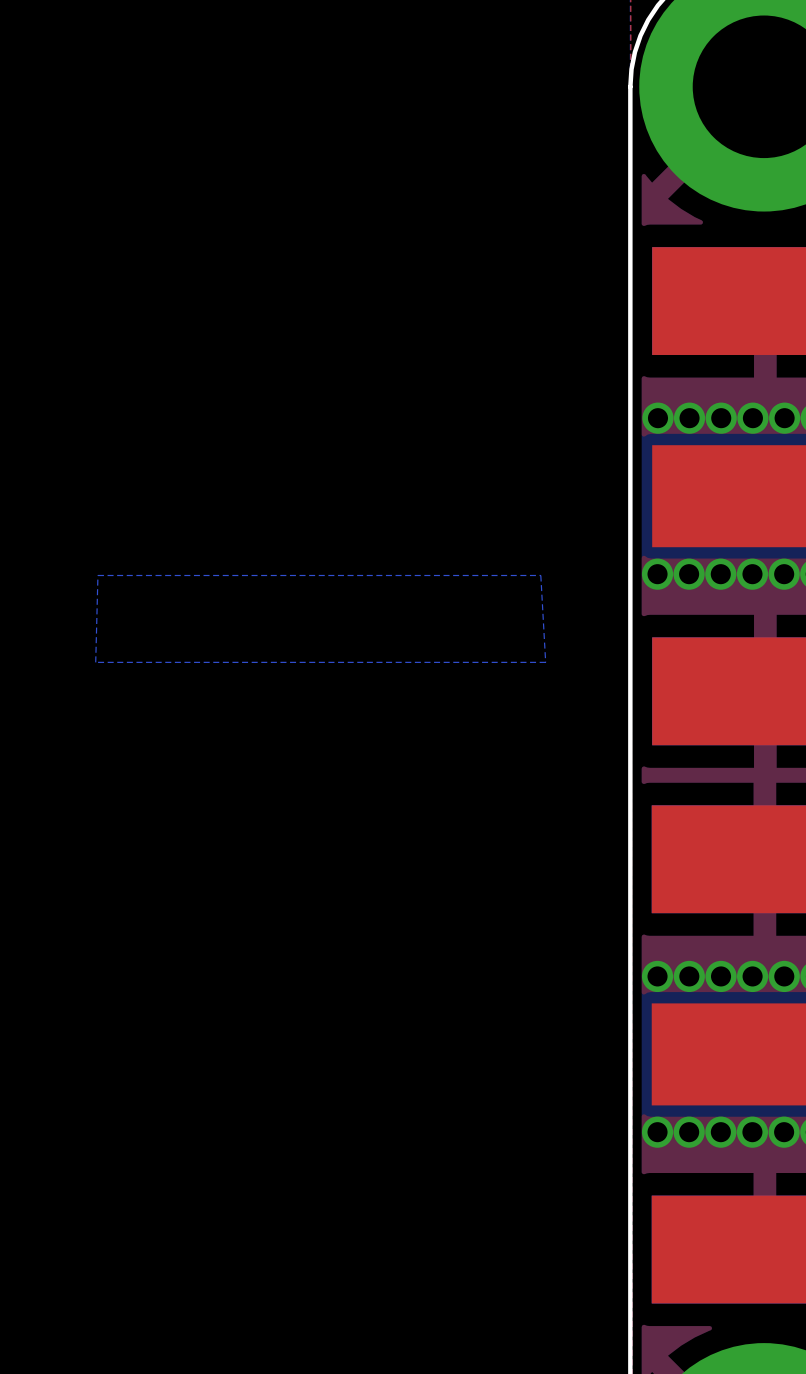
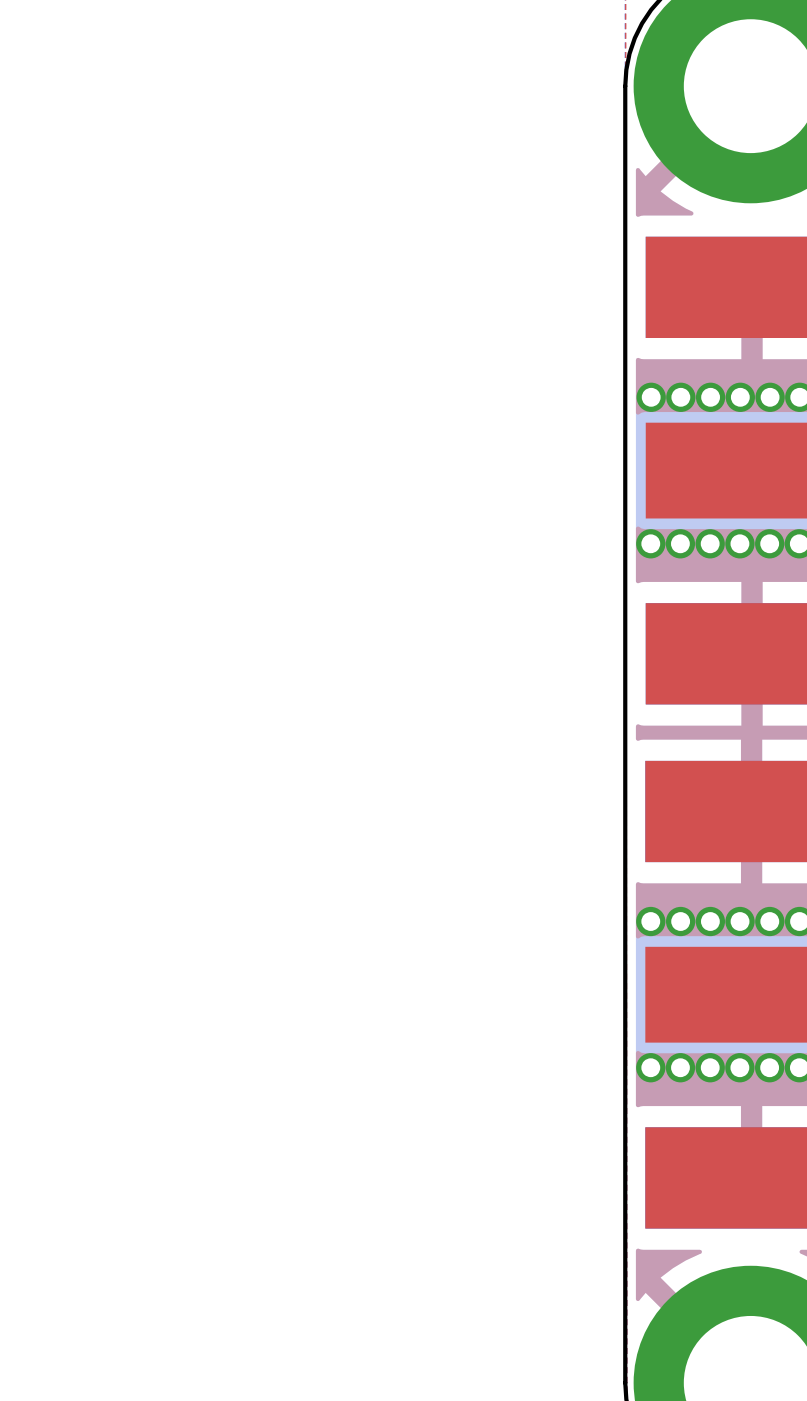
bottom zone outline: (97, 575) (540, 575) (545, 662) (95, 662) (97, 575) -> none

